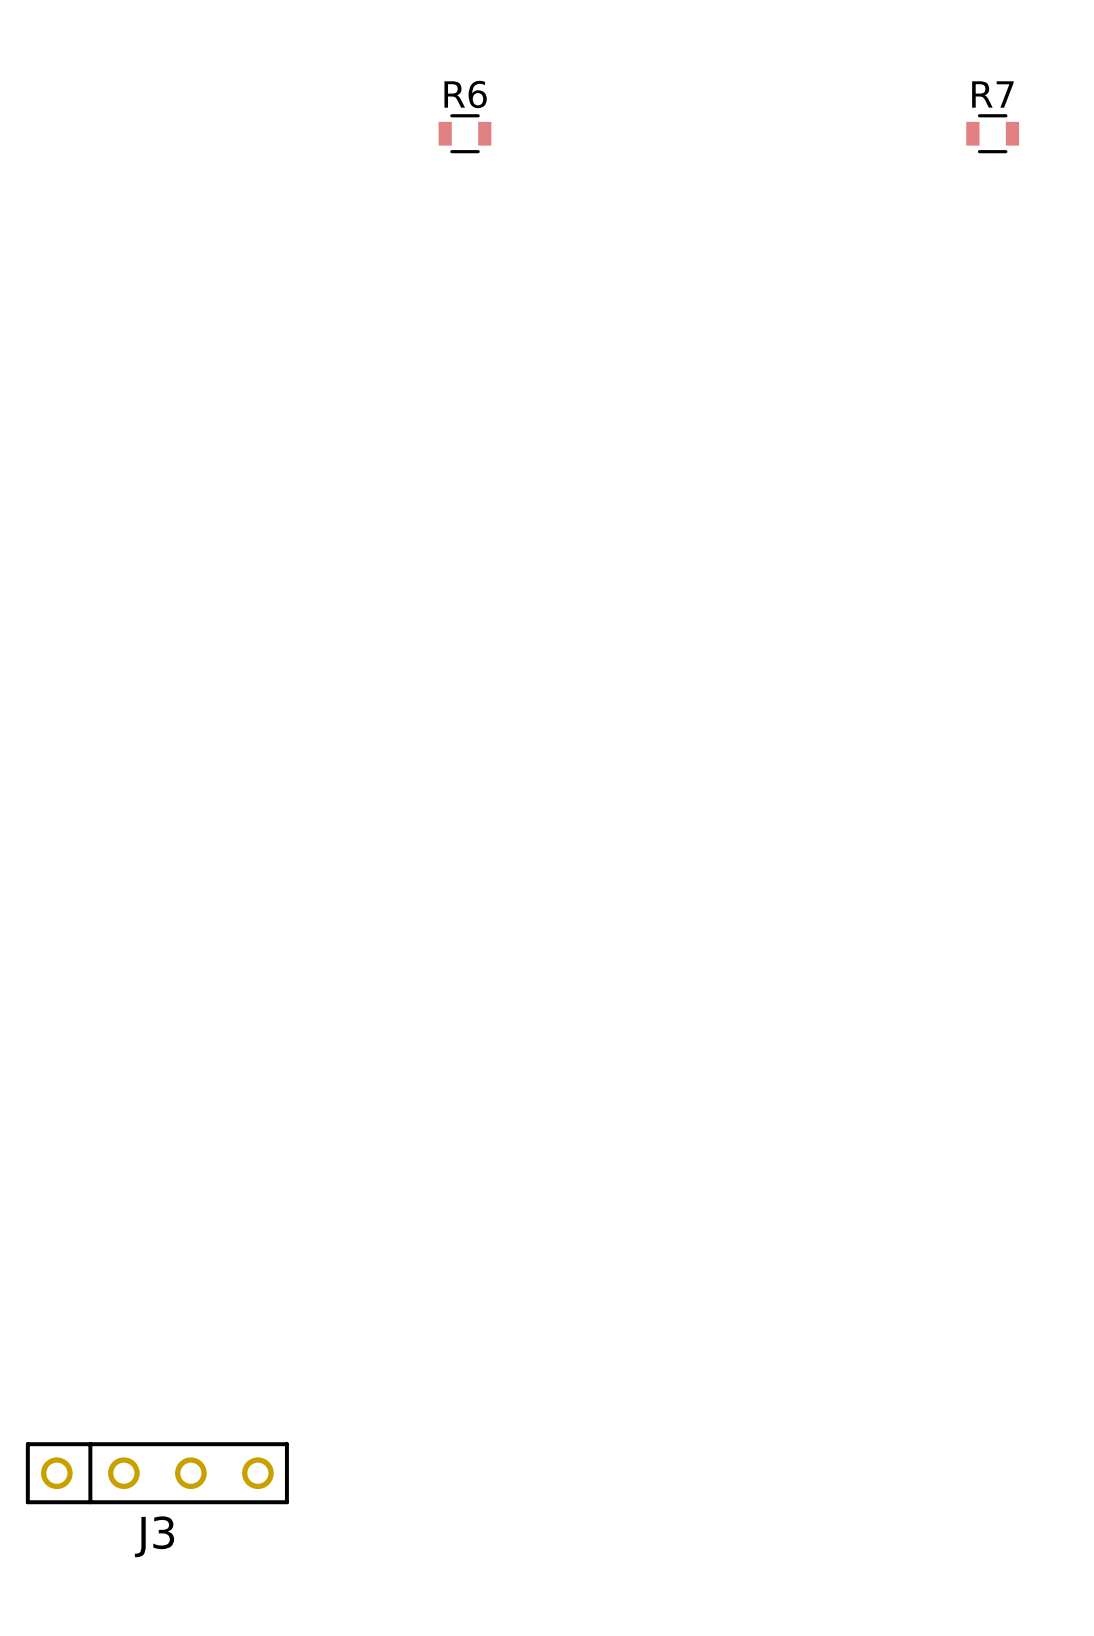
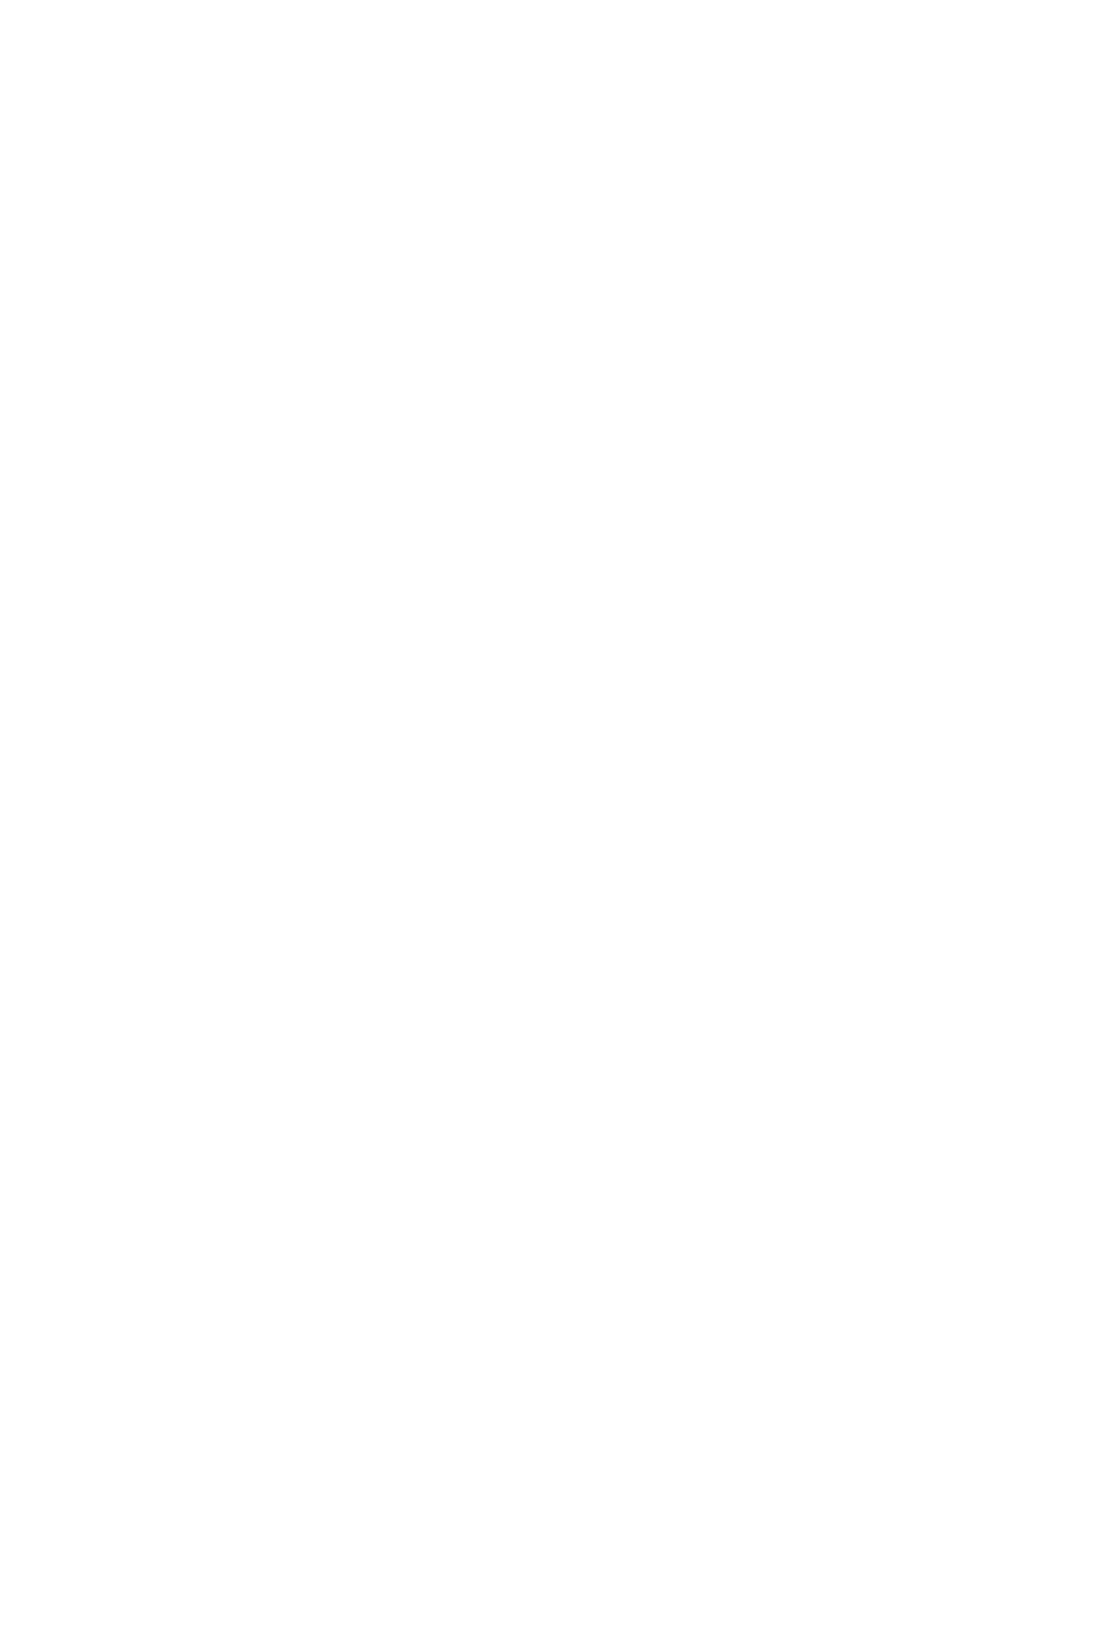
R6: (464, 133) -> none
R7: (992, 133) -> none
J3: (157, 1473) -> none

